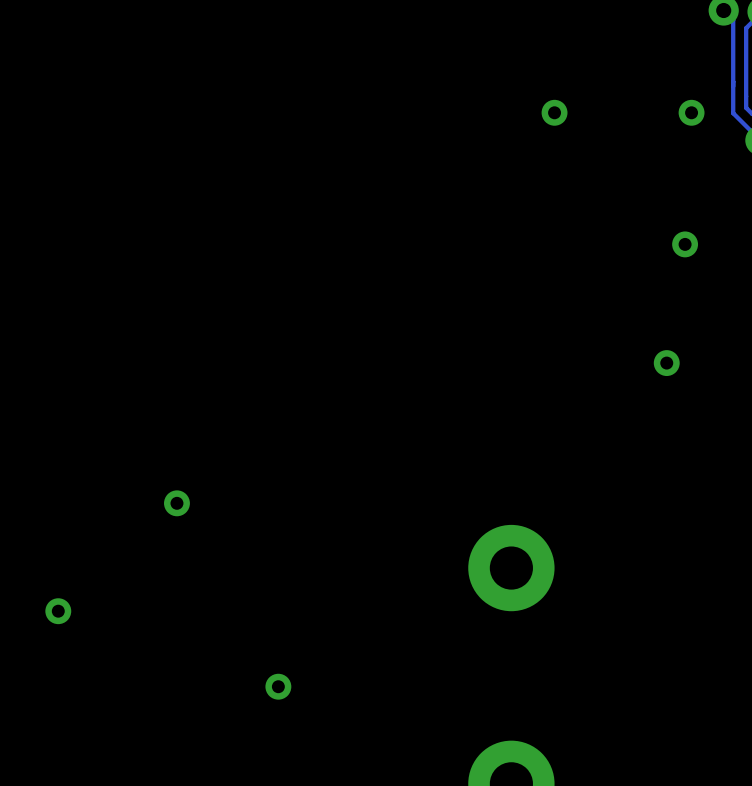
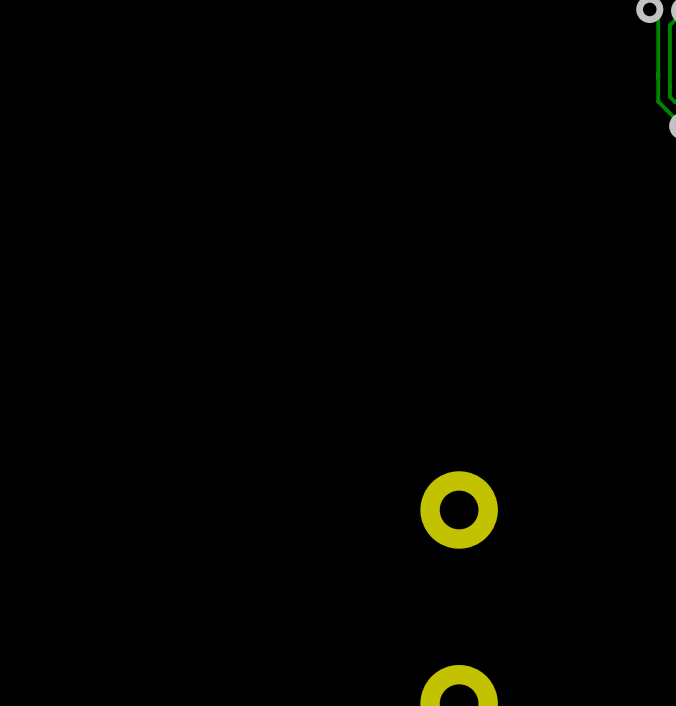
via: (554, 112) -> none
via: (691, 112) -> none
via: (685, 244) -> none
via: (666, 363) -> none
via: (176, 503) -> none
via: (58, 611) -> none
via: (278, 686) -> none

